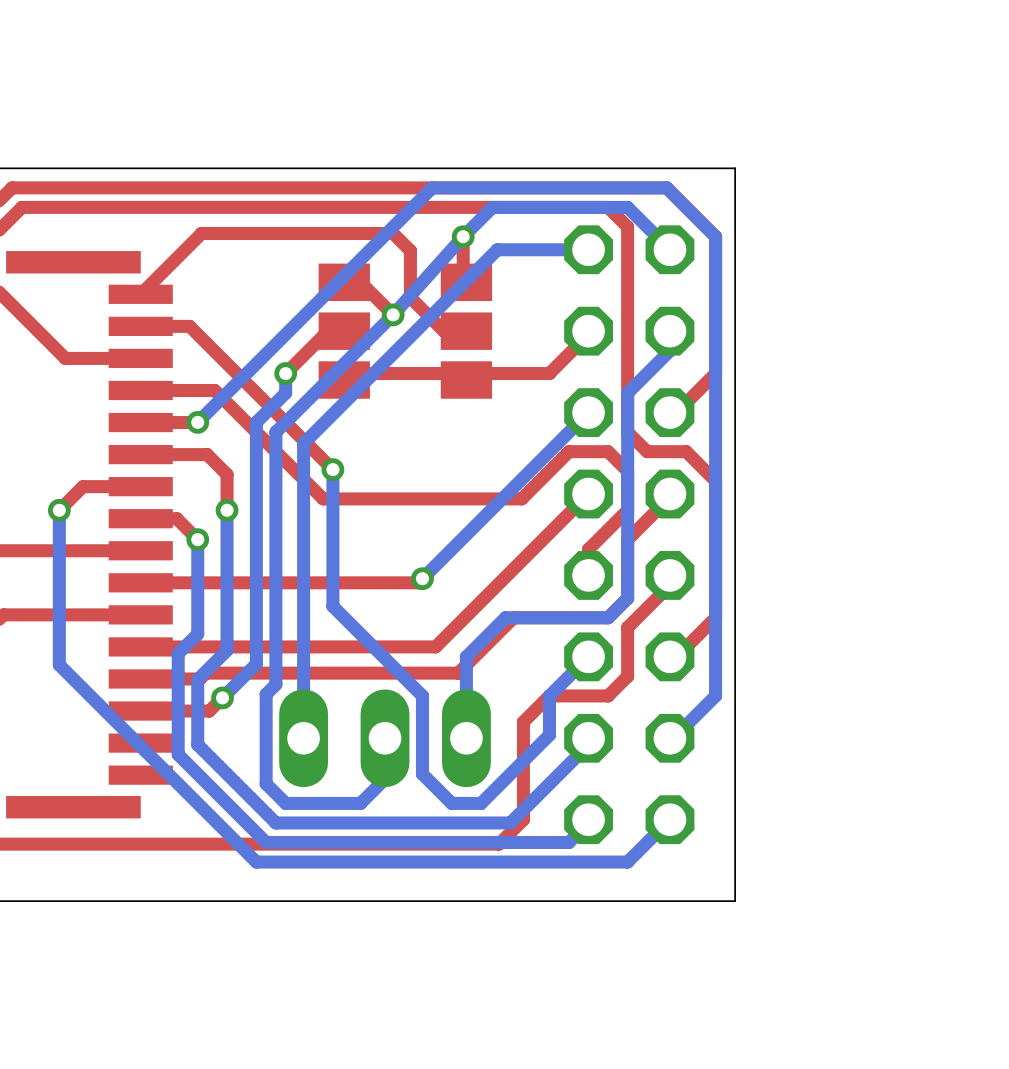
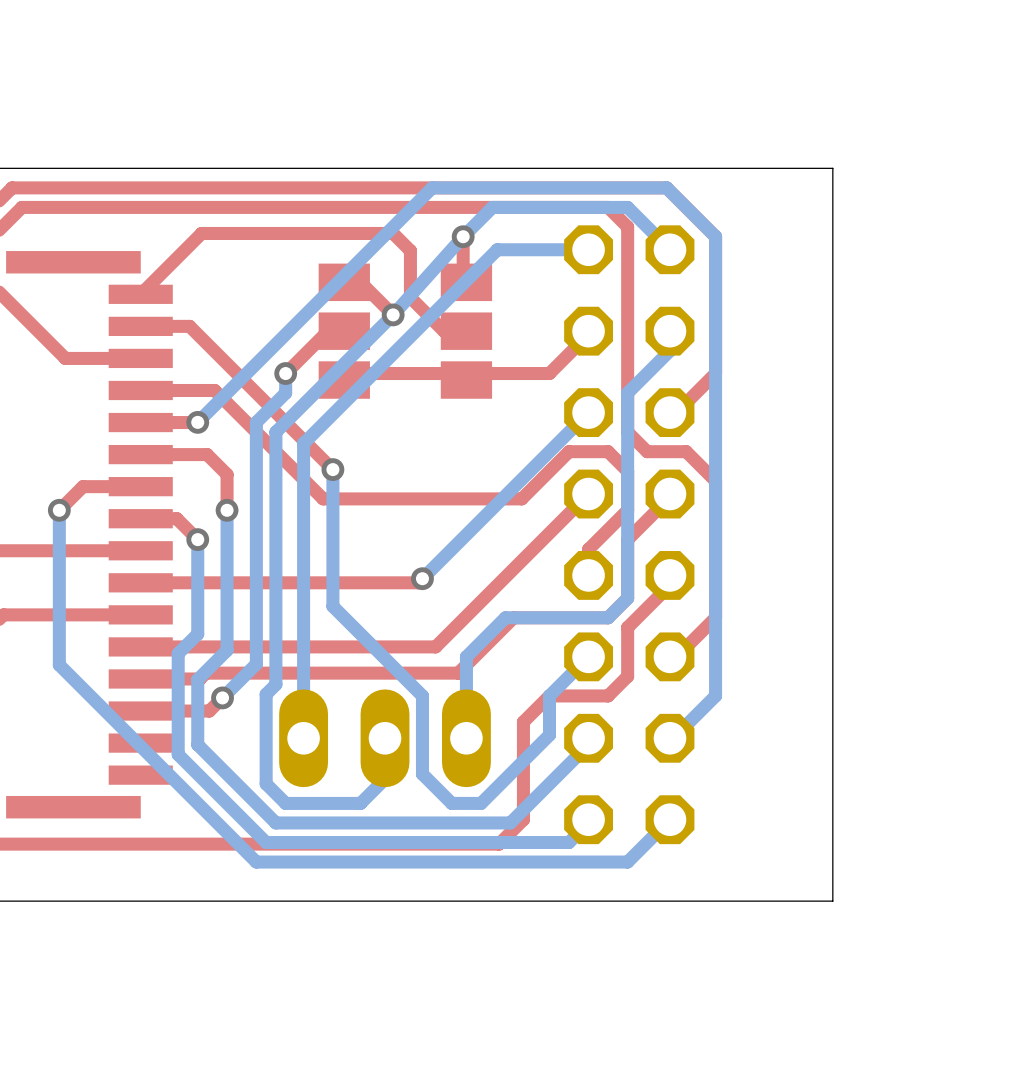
board edge: (735, 168) (735, 901) -> (735, 168) (832, 168) (832, 901) (735, 901)

